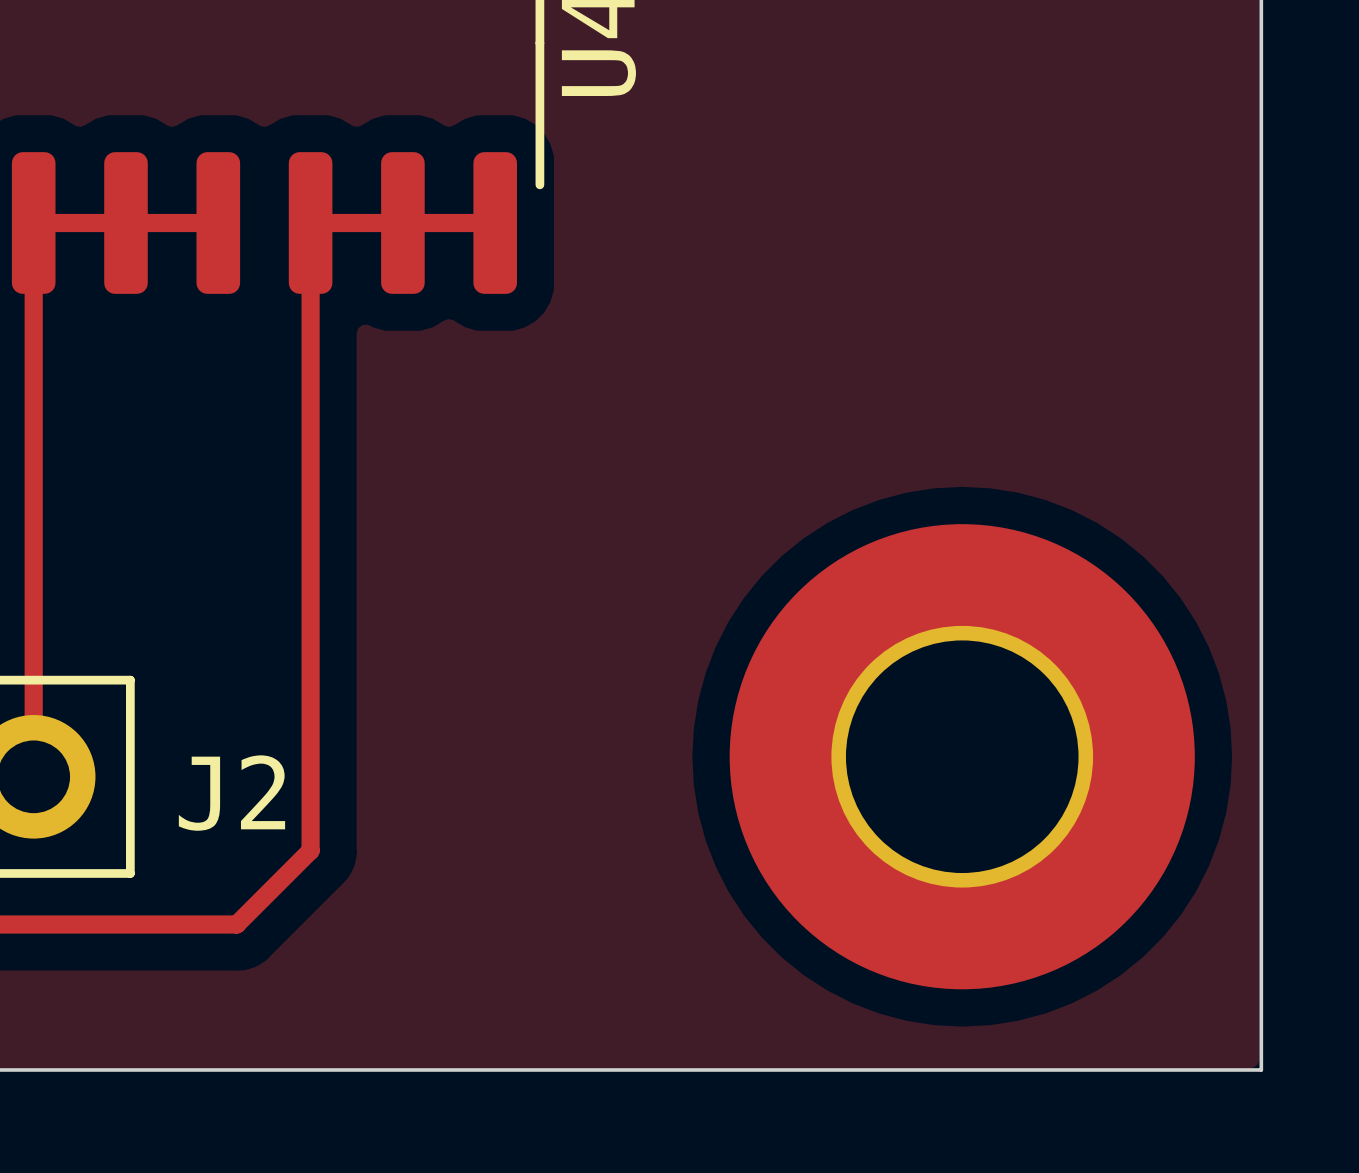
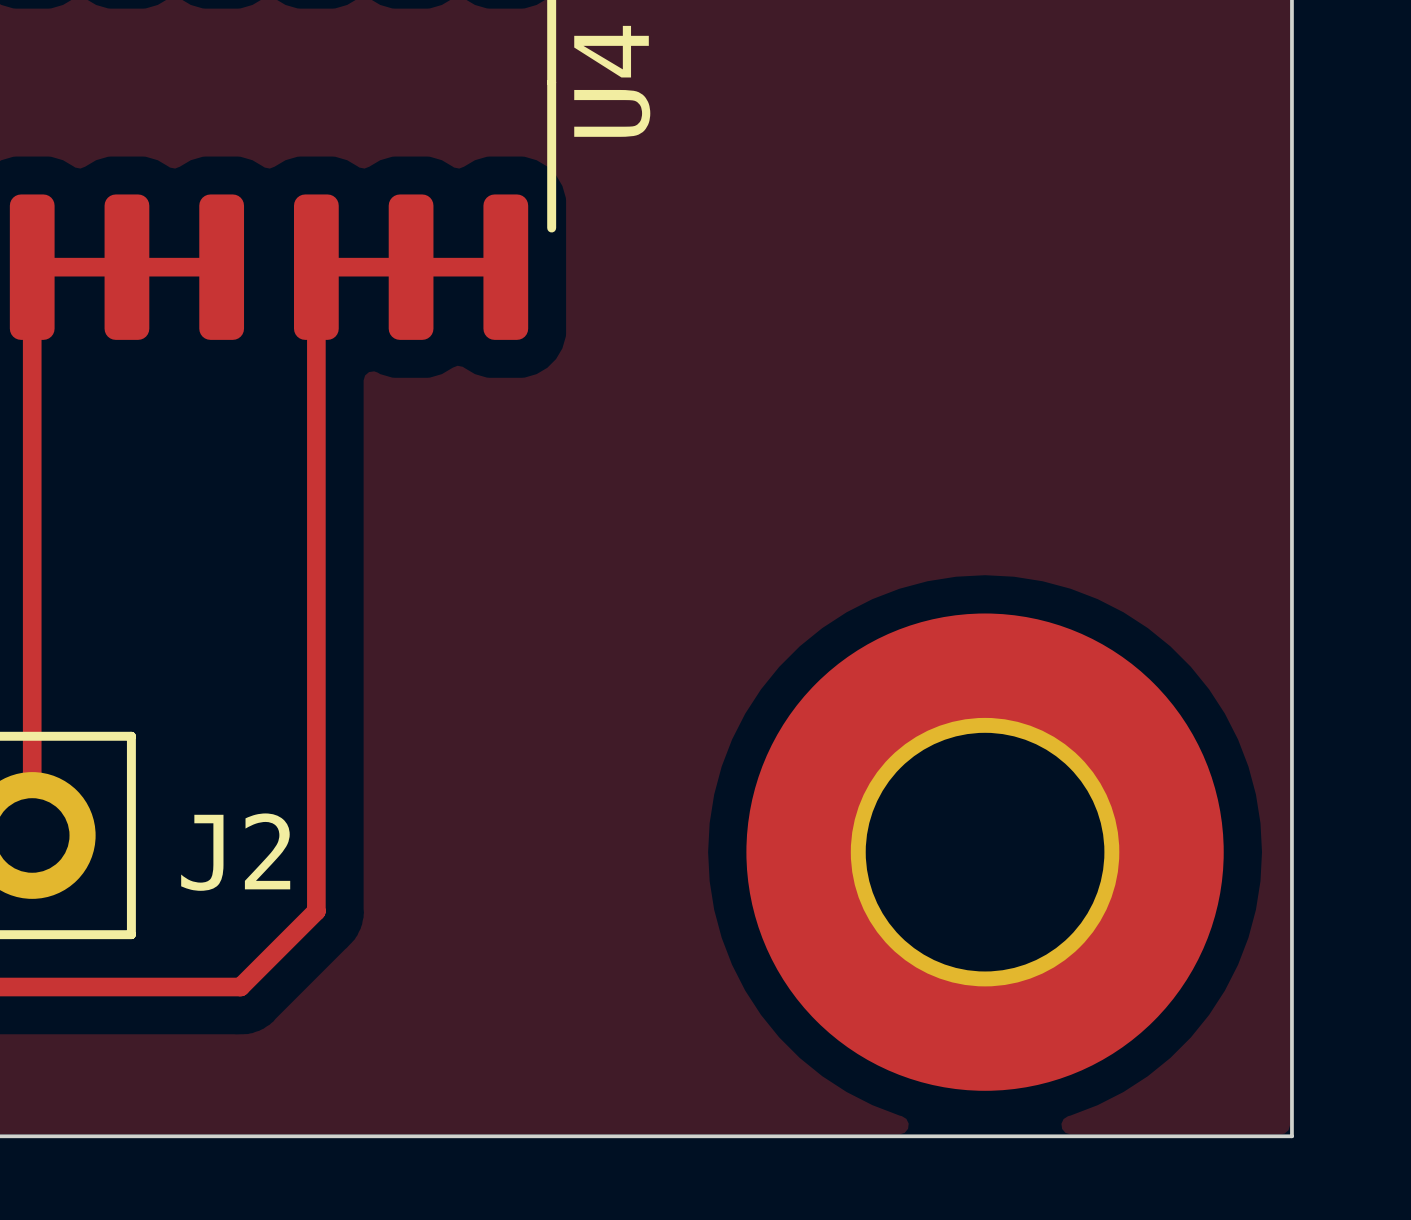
part position: (962, 756) -> (985, 852)

